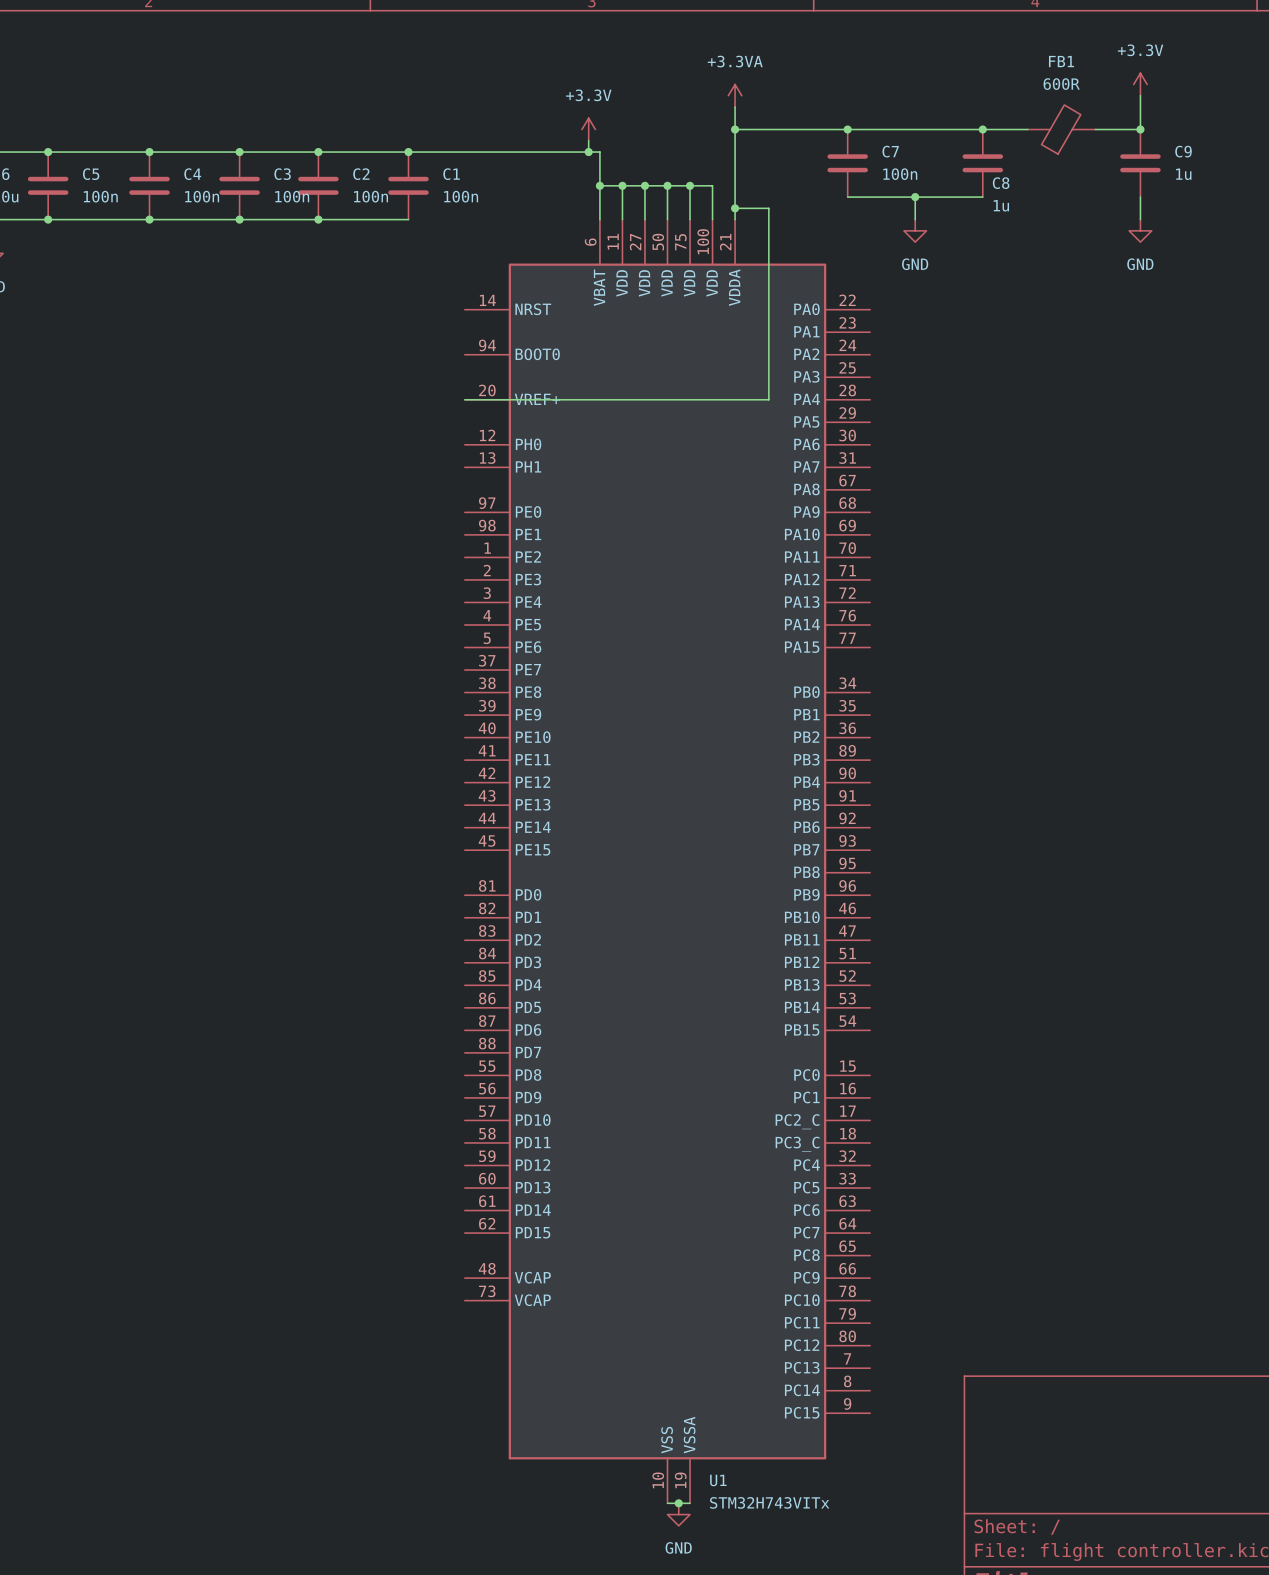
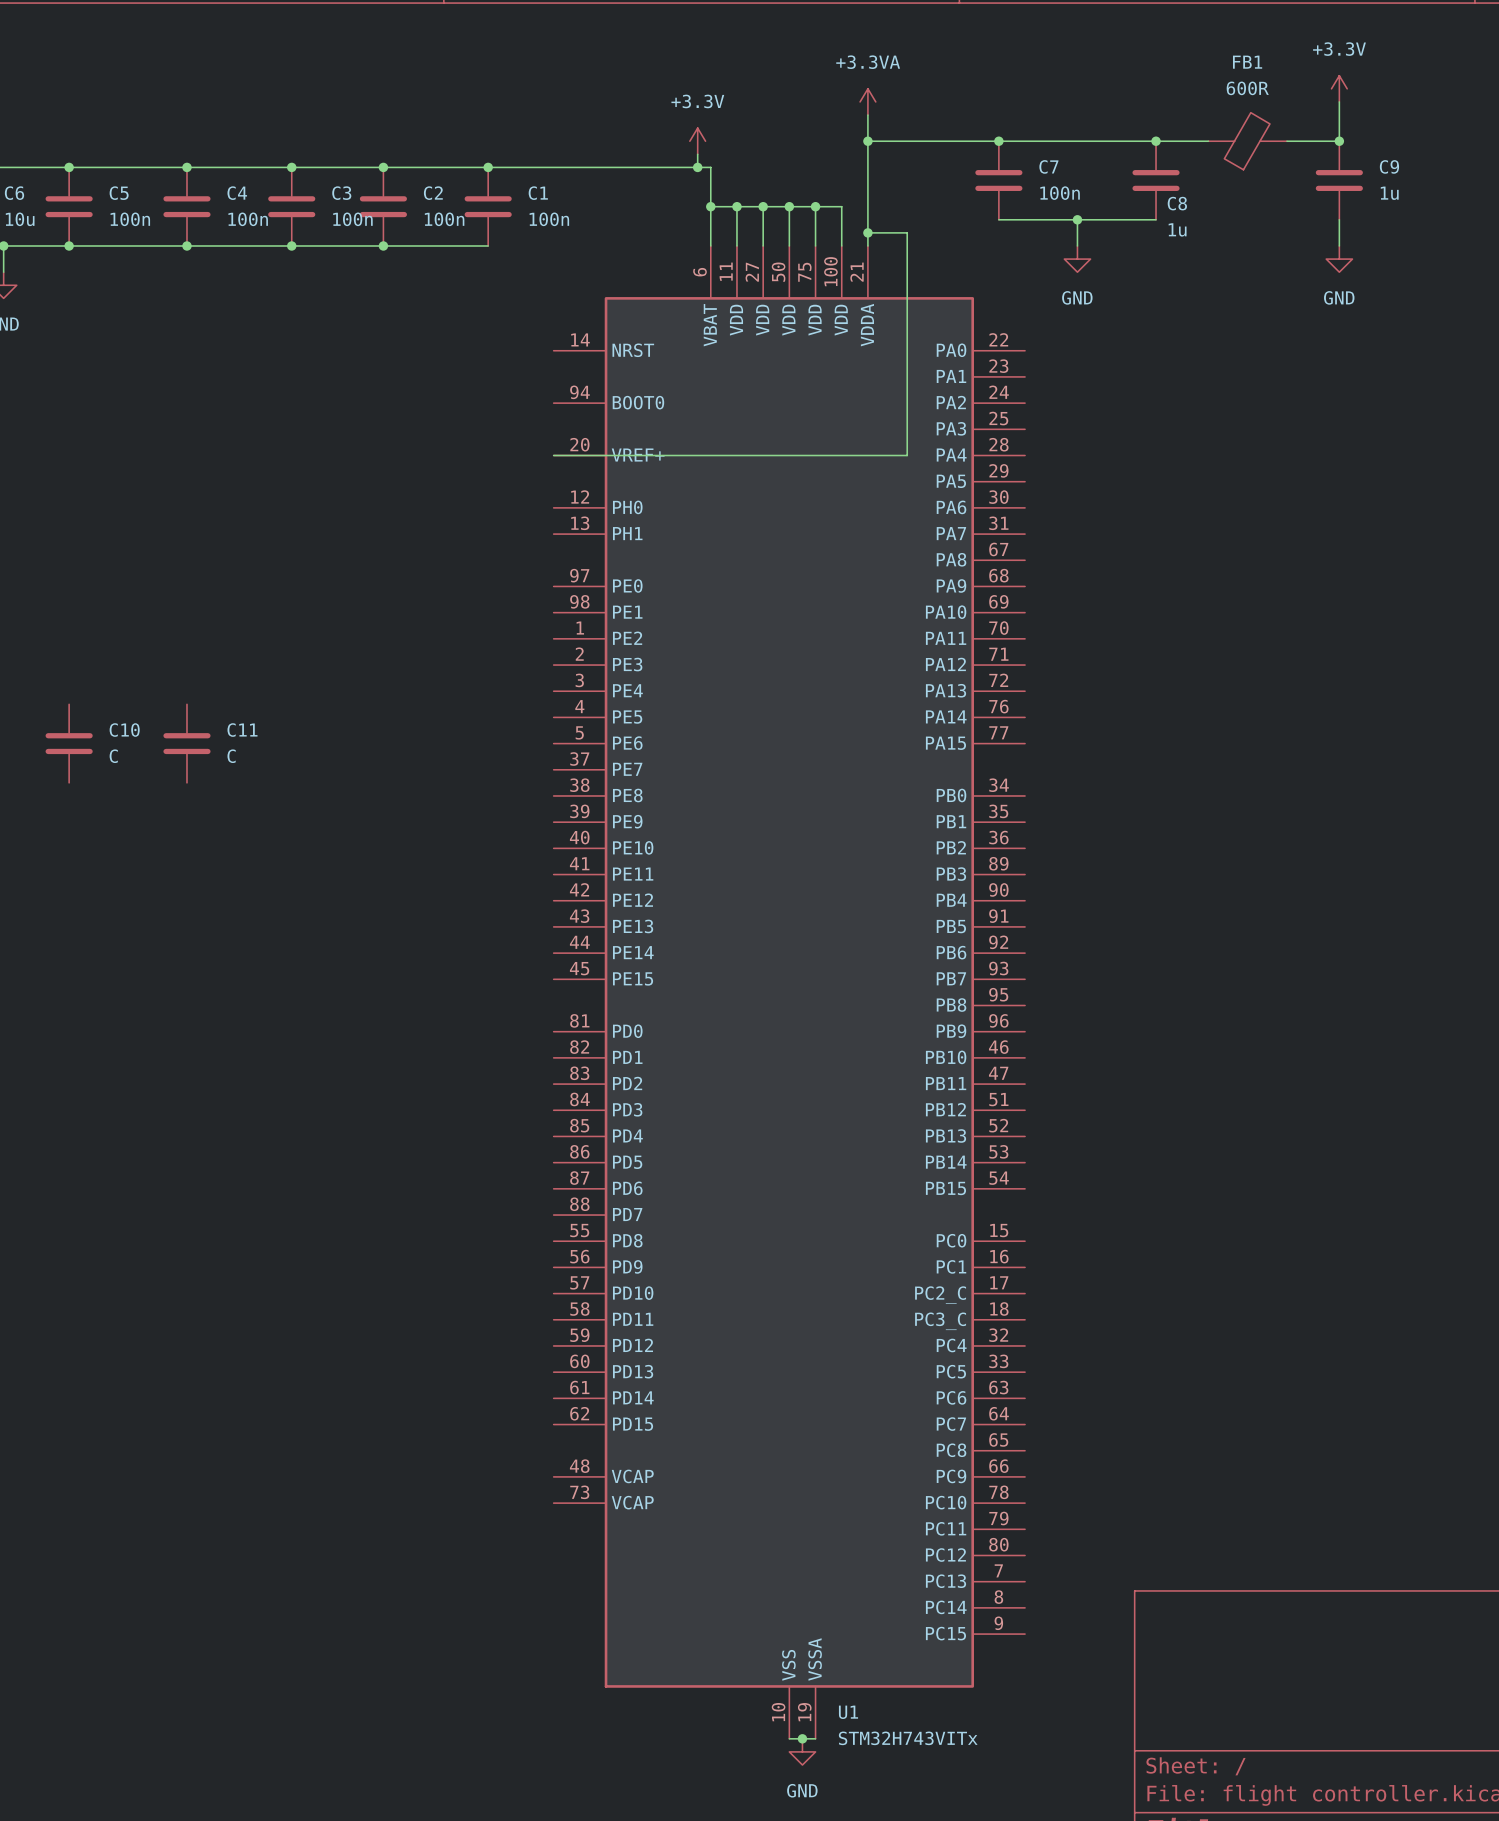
C10: none -> C (69, 743)
C11: none -> C (186, 743)

